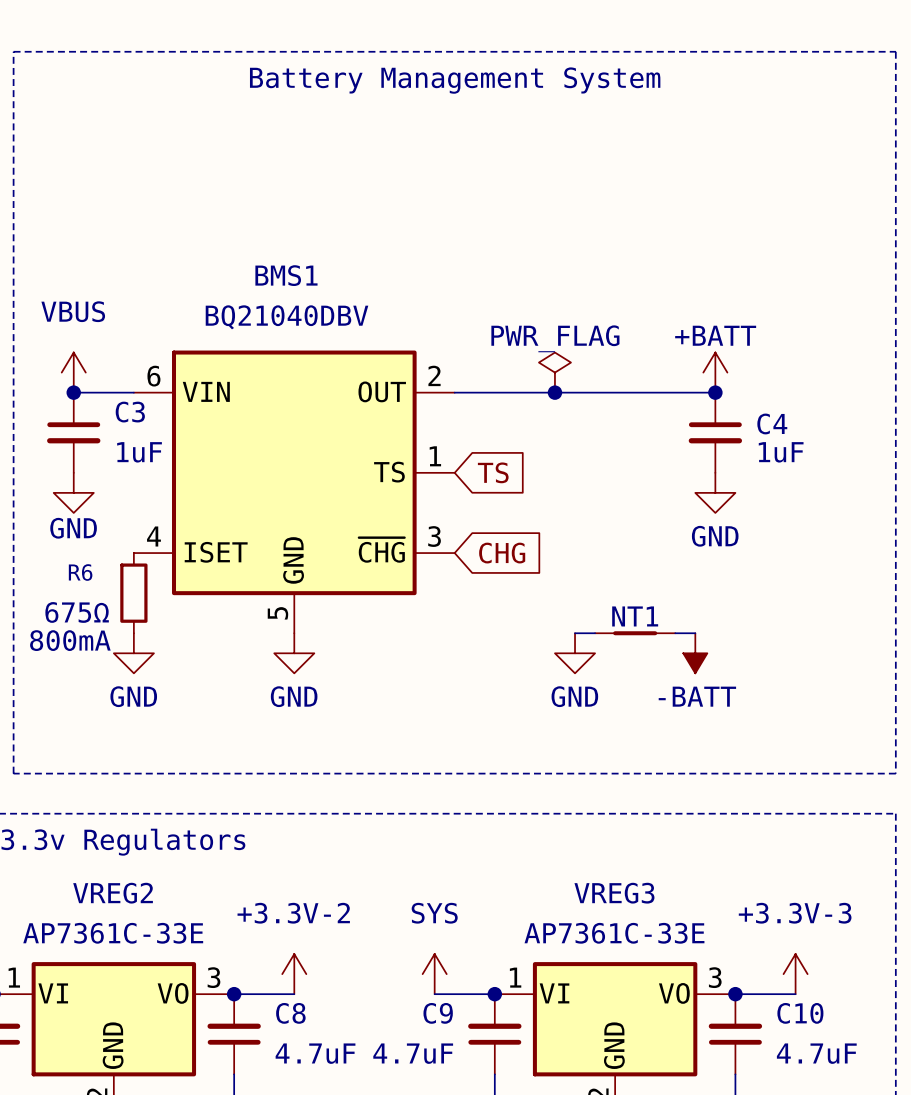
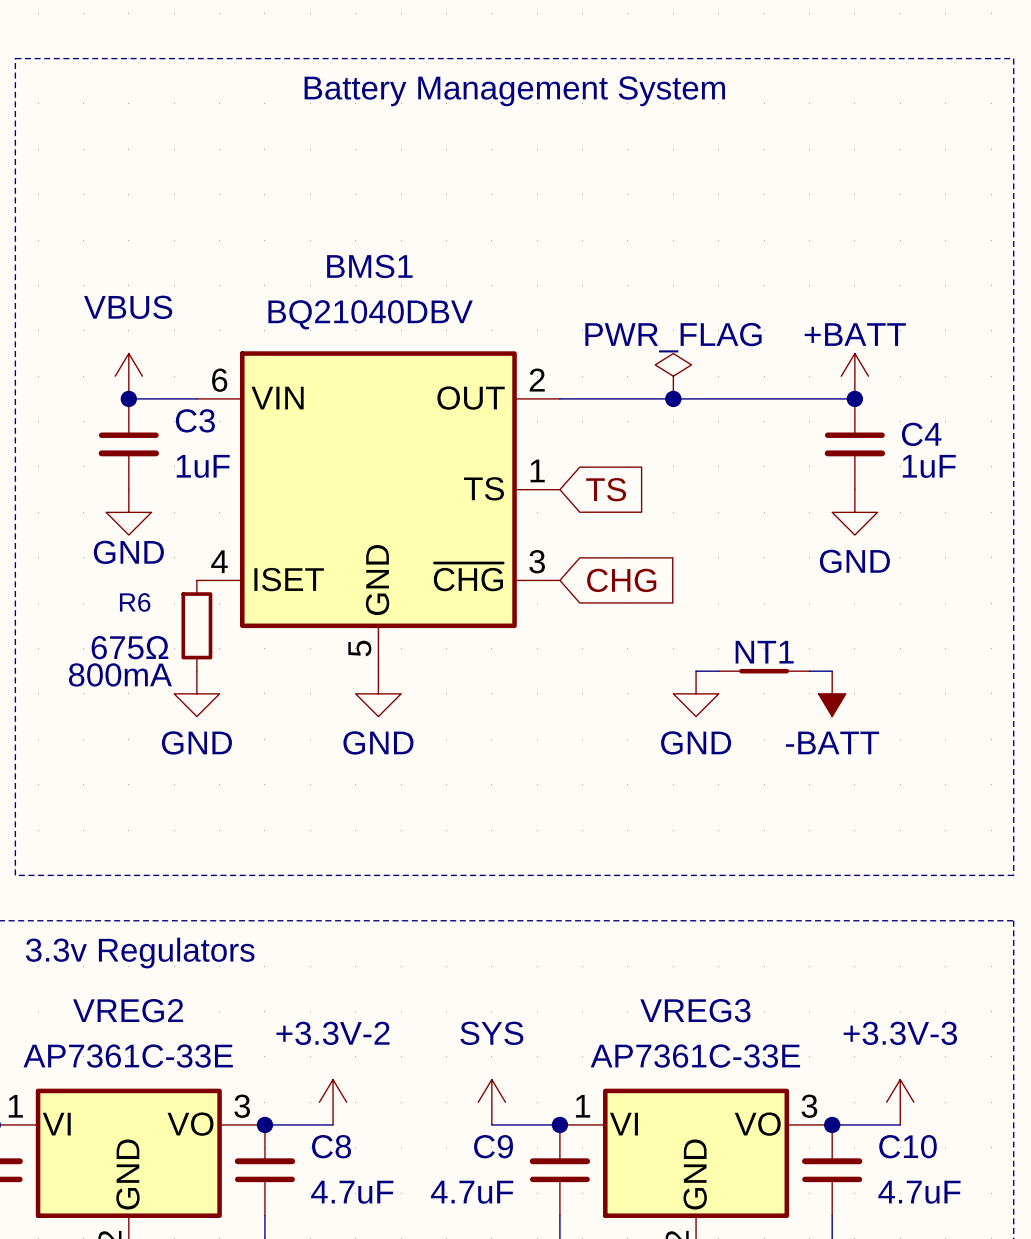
power symbol position: VBUS (73, 372) -> VBUS (128, 376)
power symbol position: PWR_FLAG (554, 372) -> PWR_FLAG (673, 376)
power symbol position: +BATT (715, 372) -> +BATT (854, 376)
wire: (73, 392) (133, 392) -> (128, 398) (196, 398)
junction position: (73, 392) -> (128, 398)
wire: (454, 392) (715, 392) -> (559, 398) (854, 398)
junction position: (554, 392) -> (673, 398)
junction position: (715, 392) -> (854, 398)
C3 position: (73, 432) -> (128, 444)
C4 position: (715, 432) -> (854, 444)
global label position: TS (493, 472) -> TS (606, 489)
BMS1 position: (294, 491) -> (378, 511)
power symbol position: GND (73, 492) -> GND (128, 512)
power symbol position: GND (715, 492) -> GND (854, 512)
global label position: CHG (502, 553) -> CHG (621, 580)
R6 position: (133, 593) -> (196, 625)
wire: (575, 633) (595, 633) -> (696, 671) (718, 671)
NT1 position: (635, 633) -> (764, 671)
wire: (675, 633) (695, 633) -> (809, 671) (832, 671)
text position: 800mA (70, 640) -> 800mA (120, 674)
power symbol position: GND (133, 653) -> GND (196, 693)
power symbol position: GND (294, 653) -> GND (378, 693)
power symbol position: GND (575, 653) -> GND (696, 693)
power symbol position: -BATT (695, 653) -> -BATT (832, 693)

